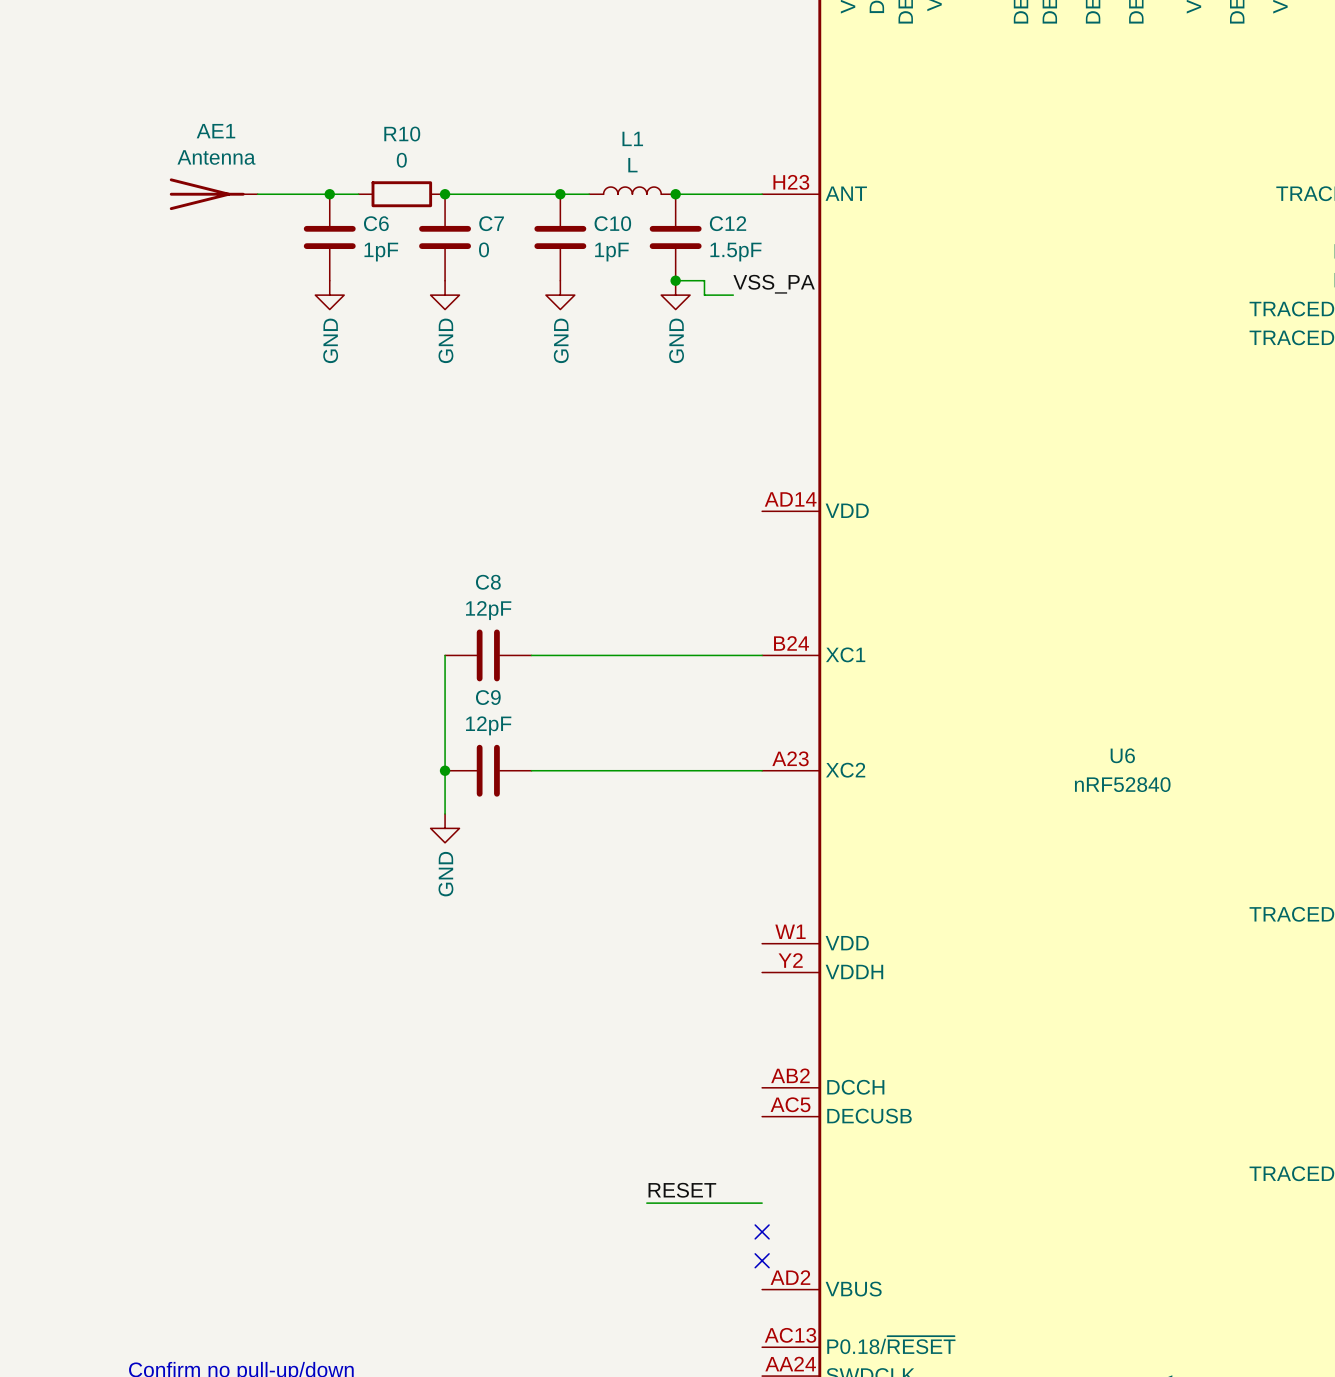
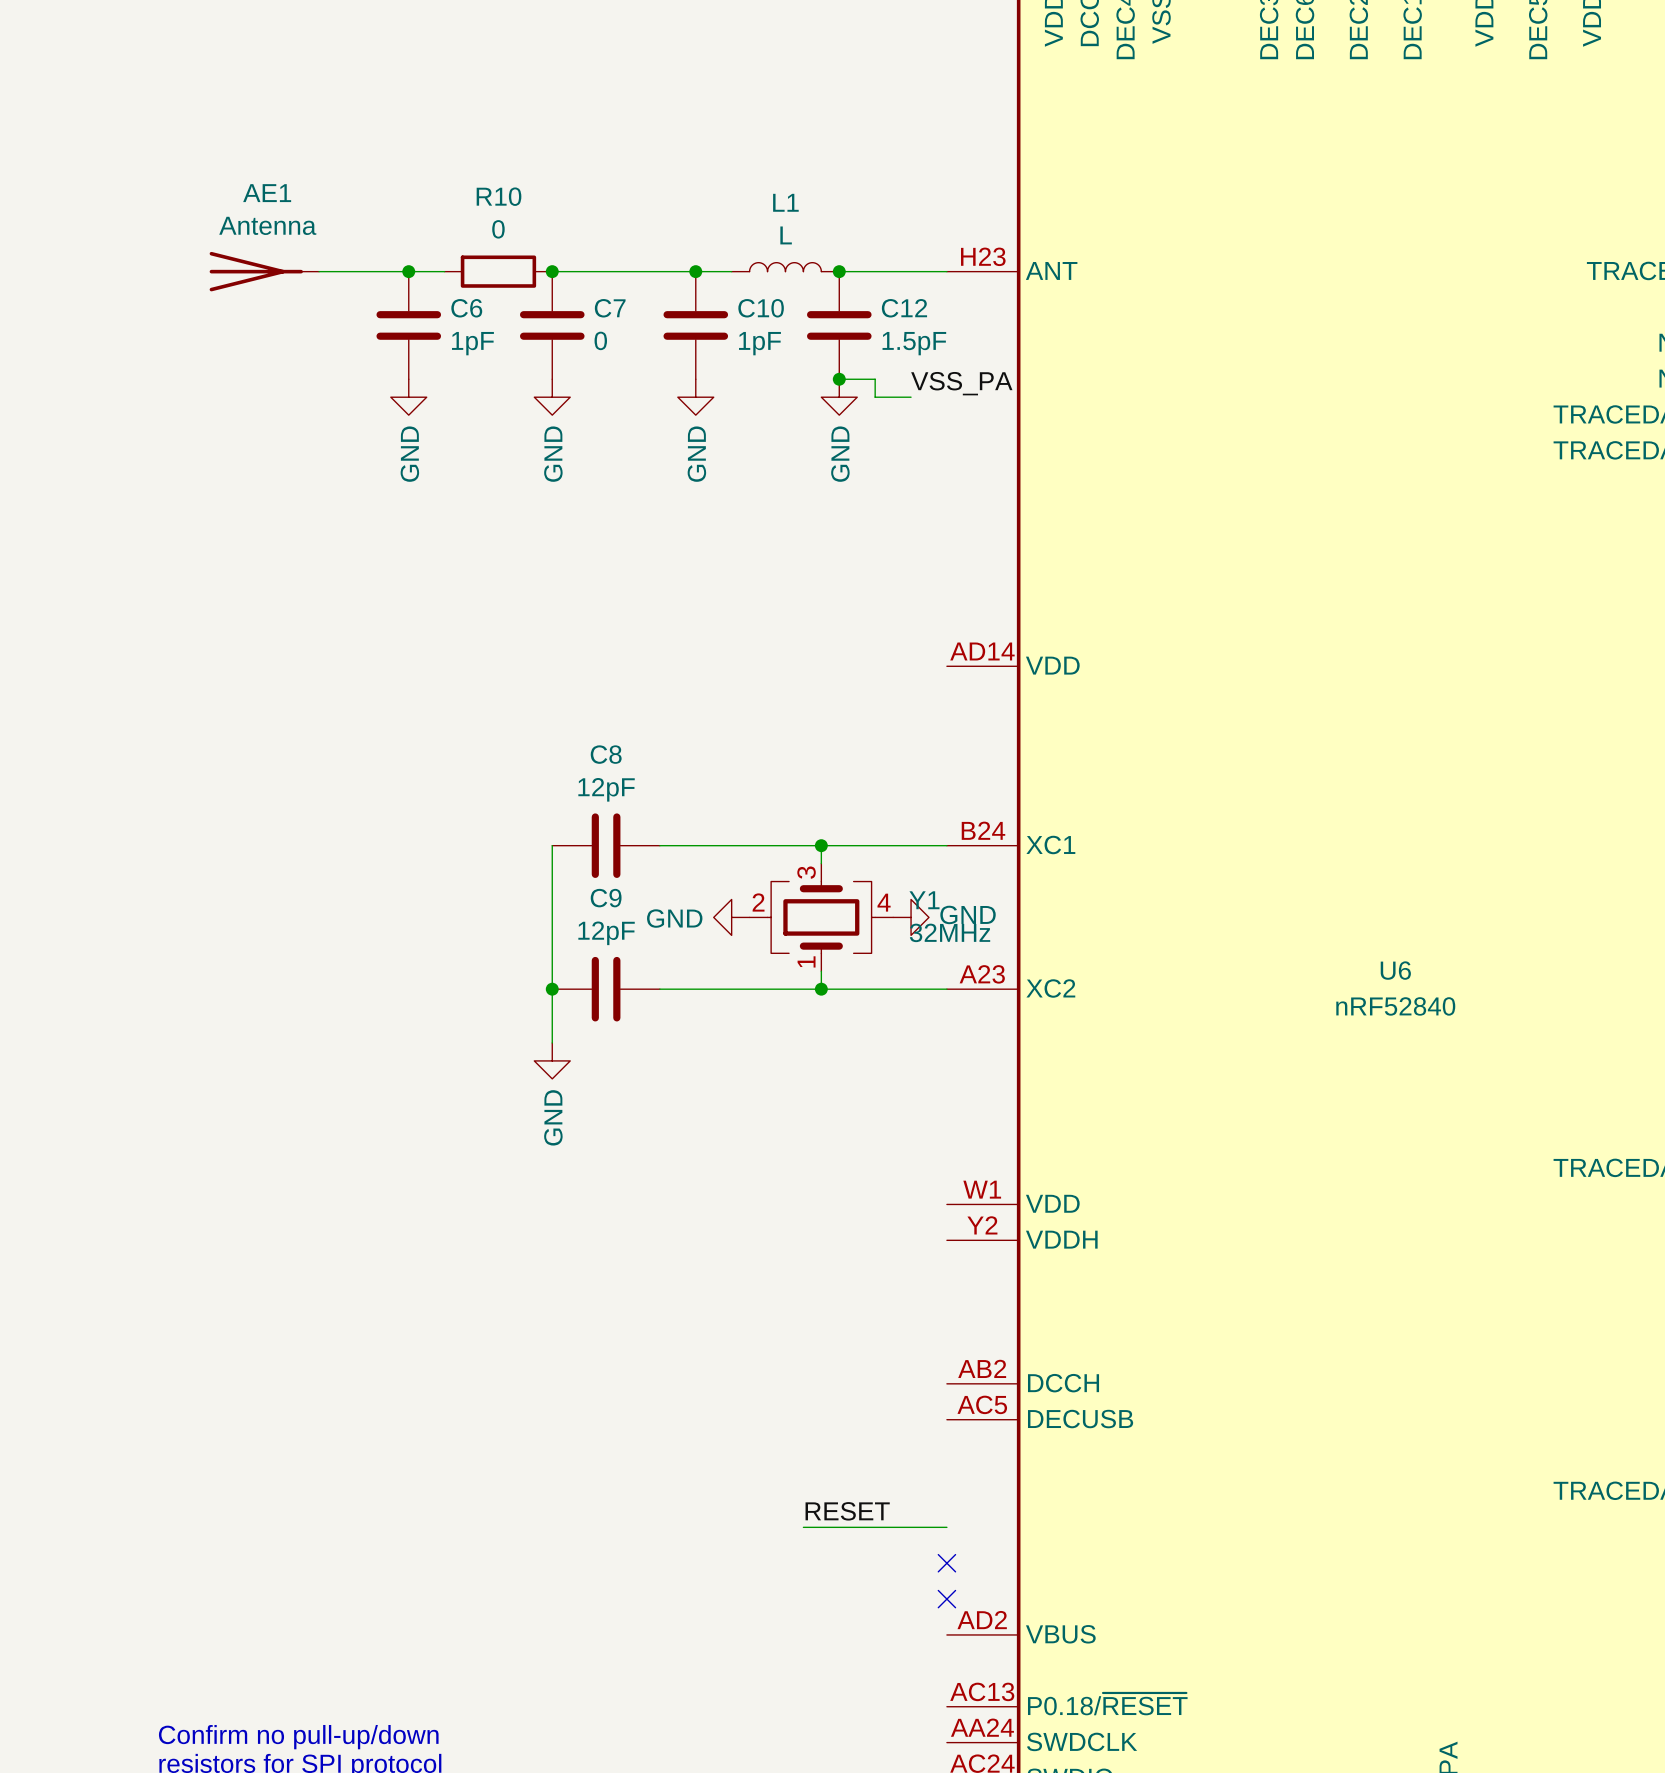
wire: none -> (821, 845) (821, 863)
junction: none -> (821, 845)
power symbol: none -> GND (731, 917)
Y1: none -> 32MHz (821, 917)
power symbol: none -> GND (911, 917)
wire: none -> (821, 971) (821, 989)
junction: none -> (821, 989)

